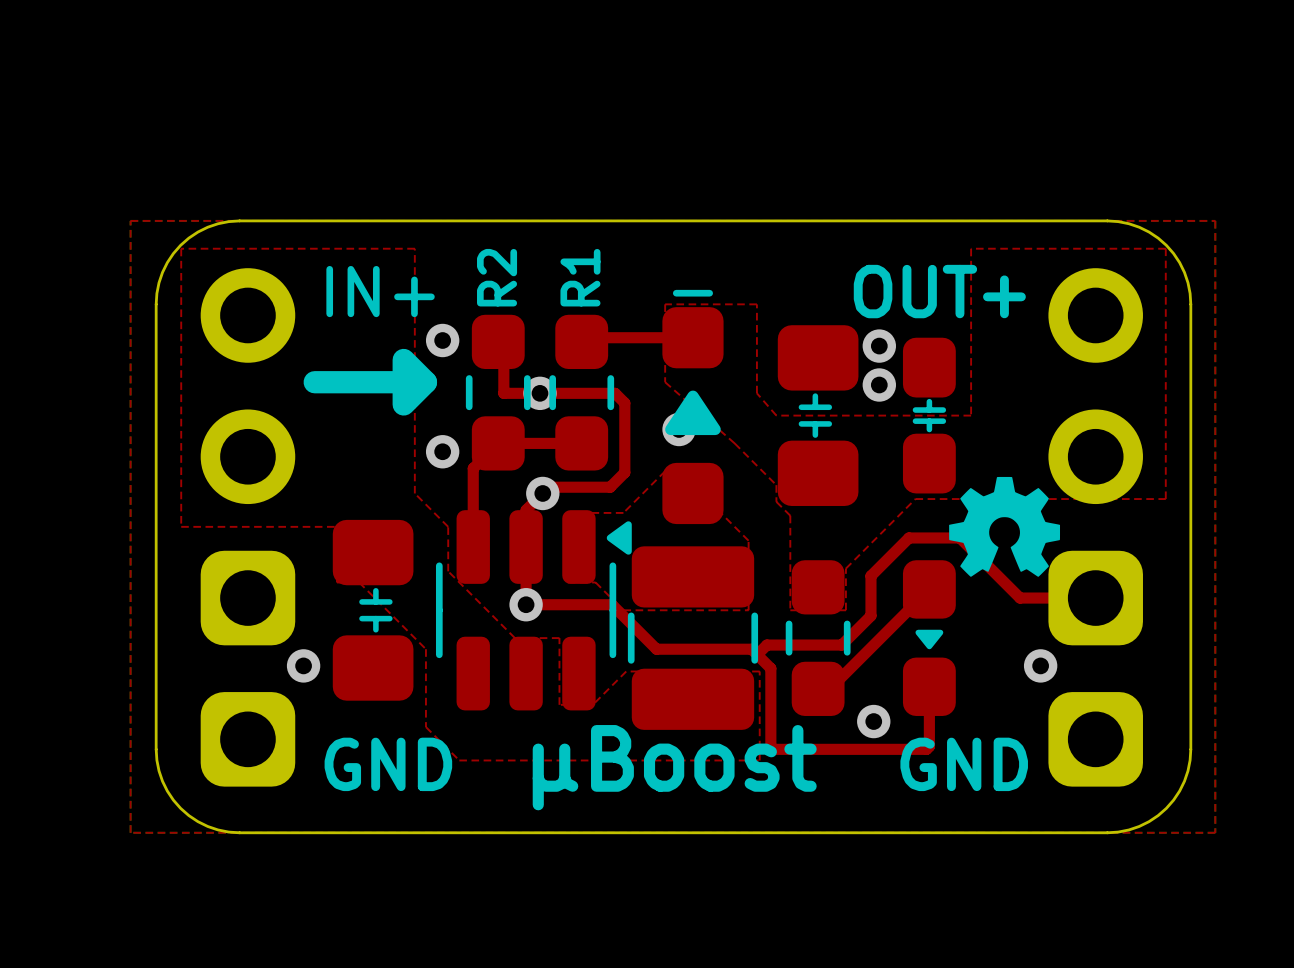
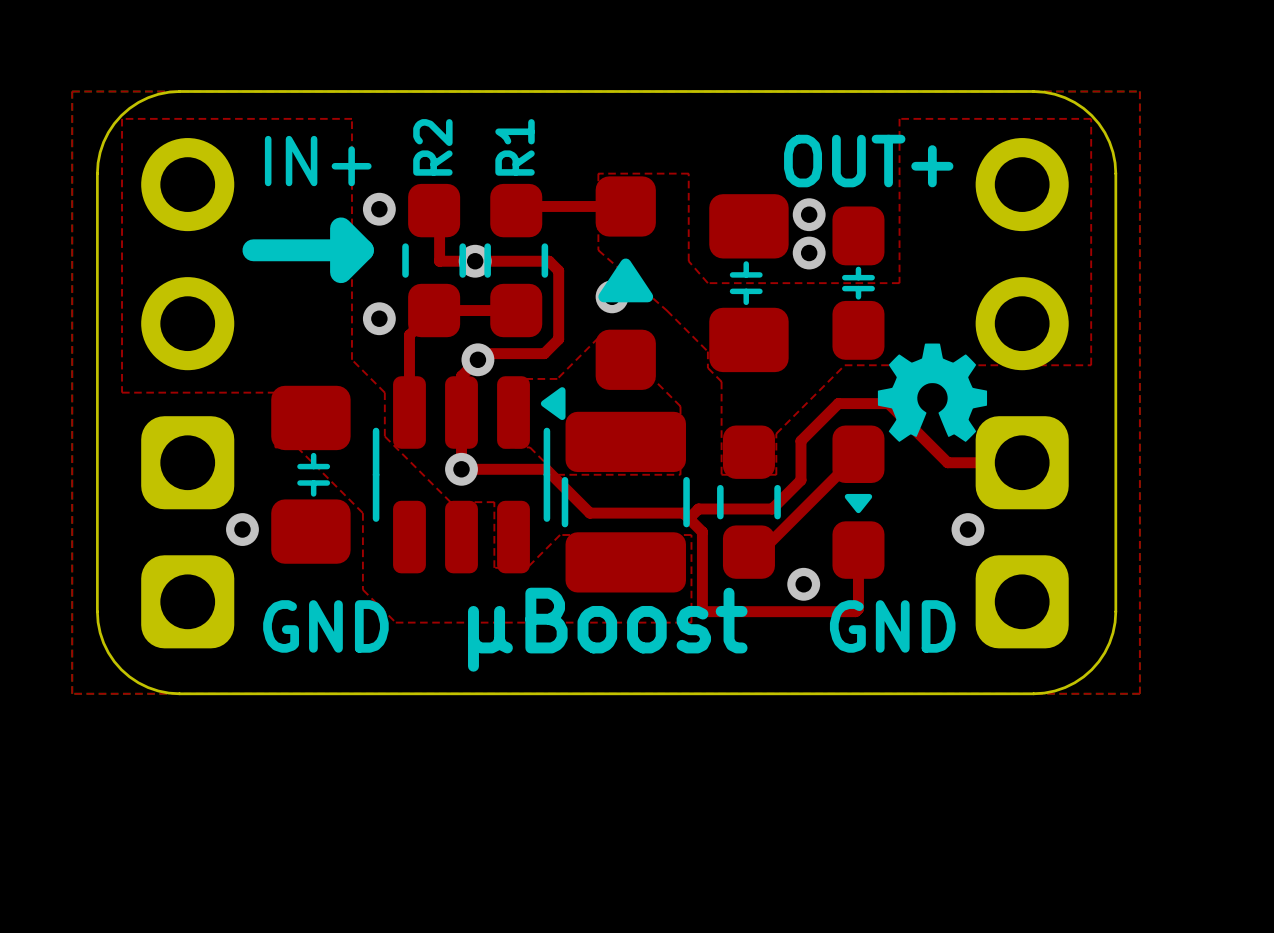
part footprint: [662, 289, 724, 525] -> [595, 176, 656, 390]

